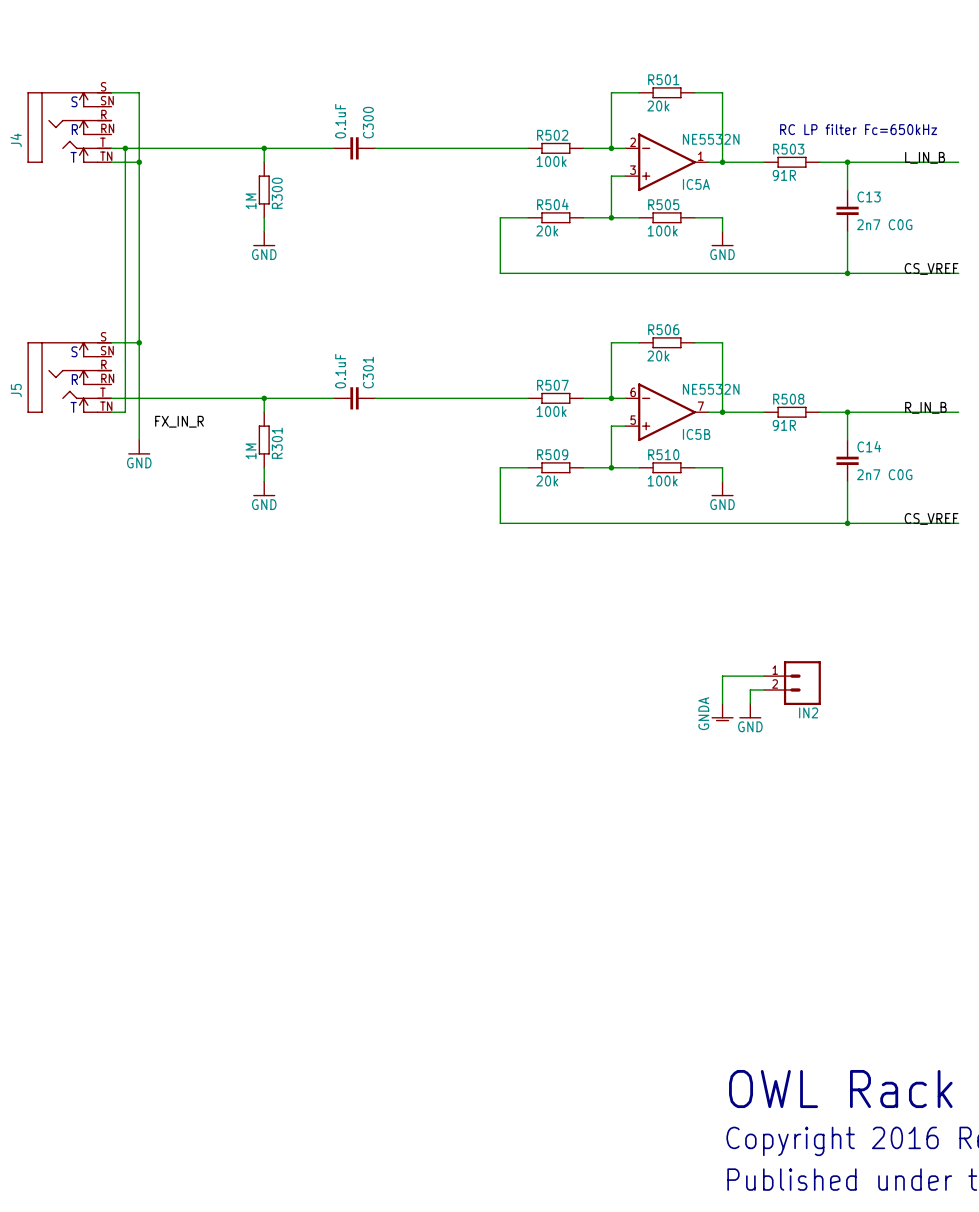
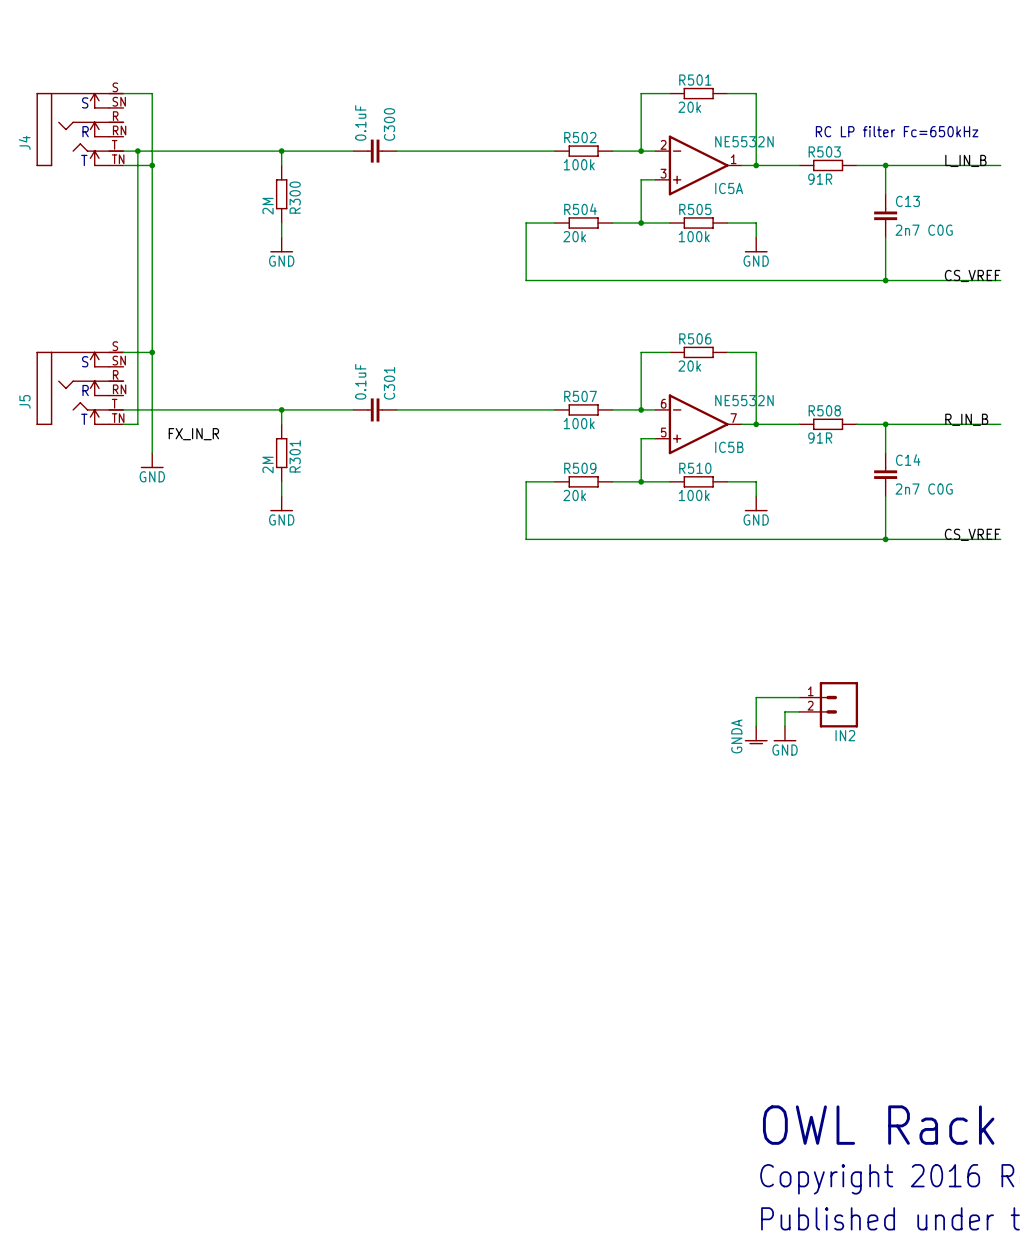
R300 value: 1M (251, 201) -> 2M (268, 206)
R301 value: 1M (251, 451) -> 2M (268, 465)

